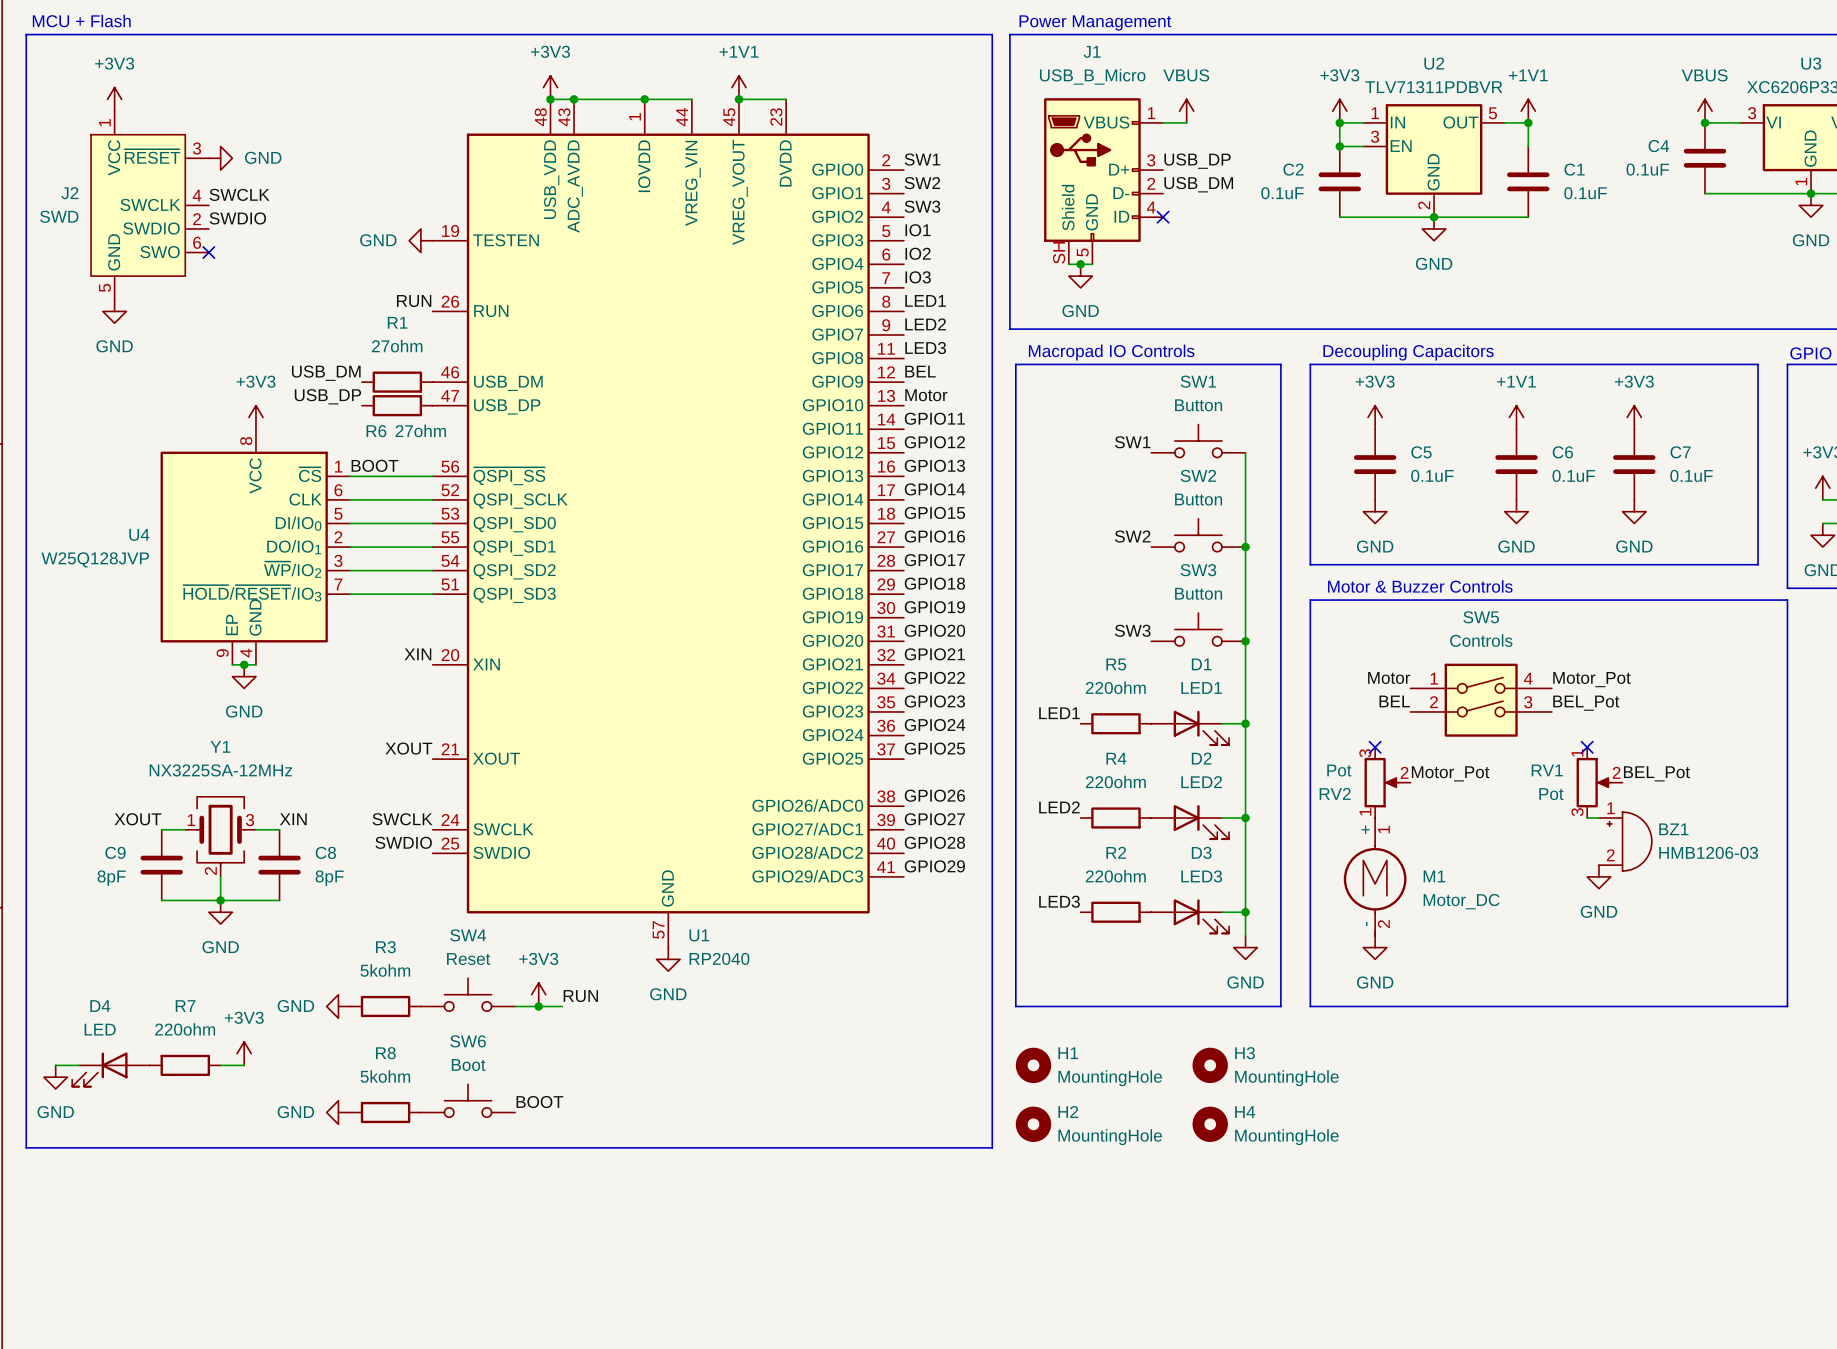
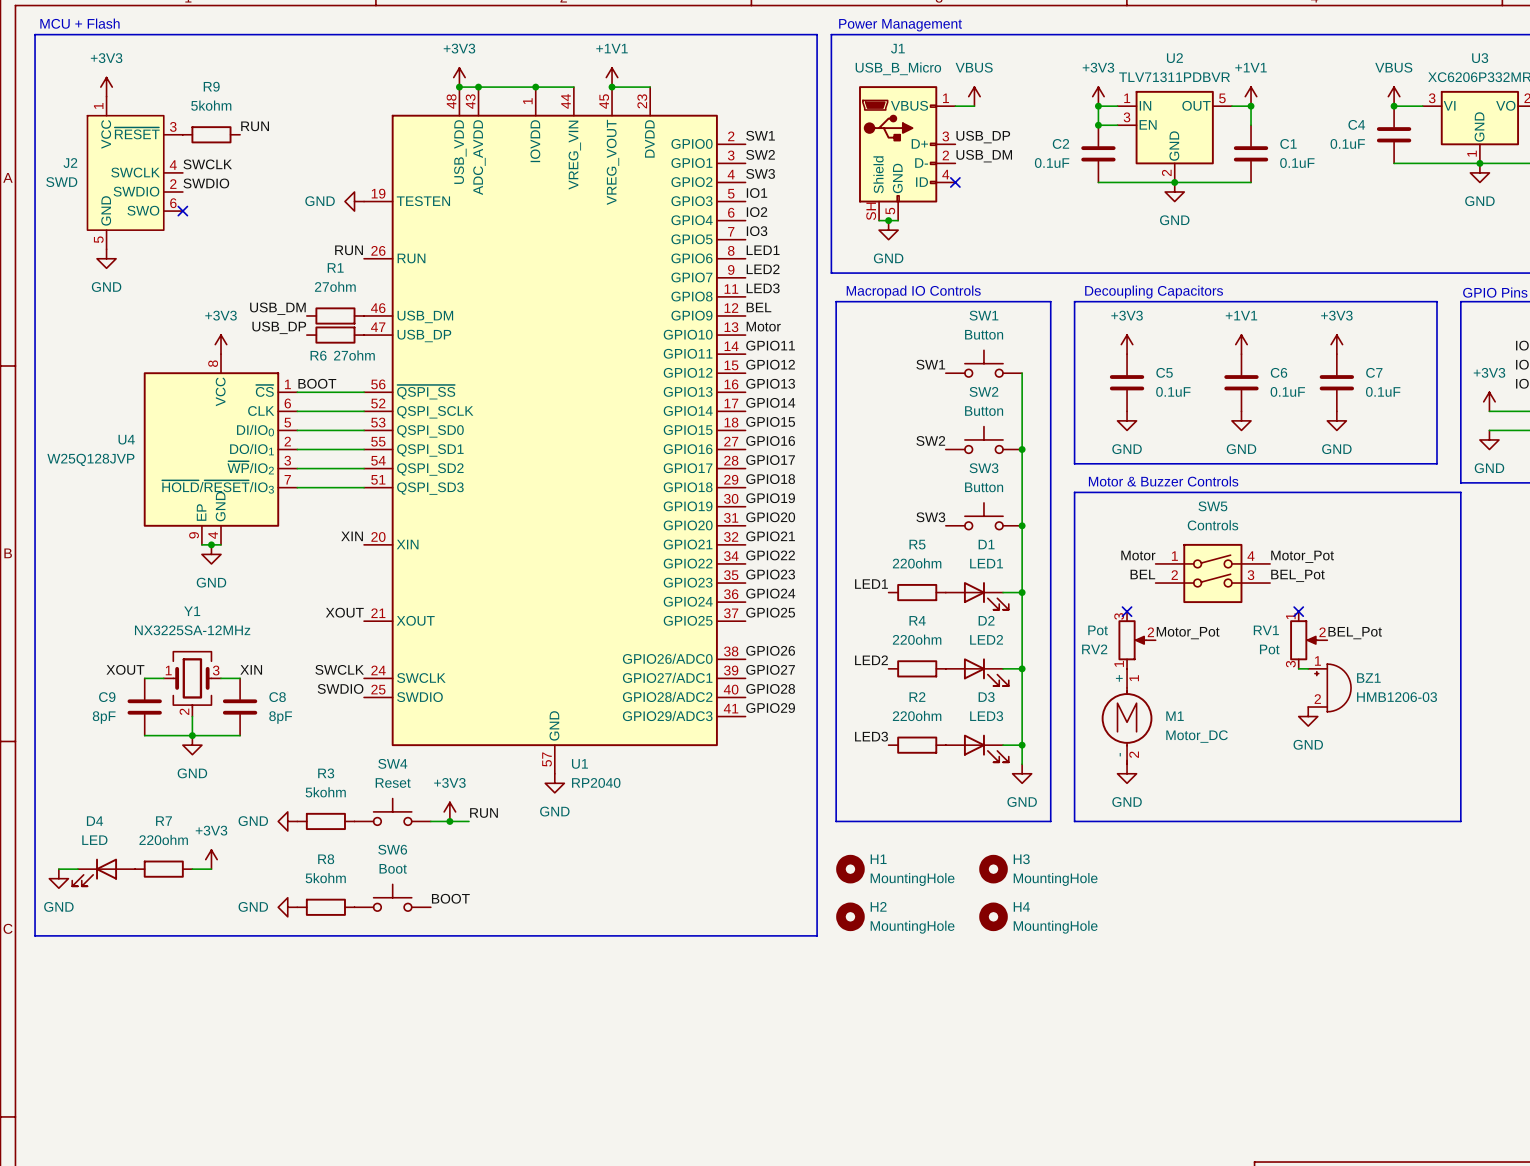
label: none -> RUN (255, 126)
power symbol: GND (220, 158) -> none
R9: none -> 5kohm (211, 134)

